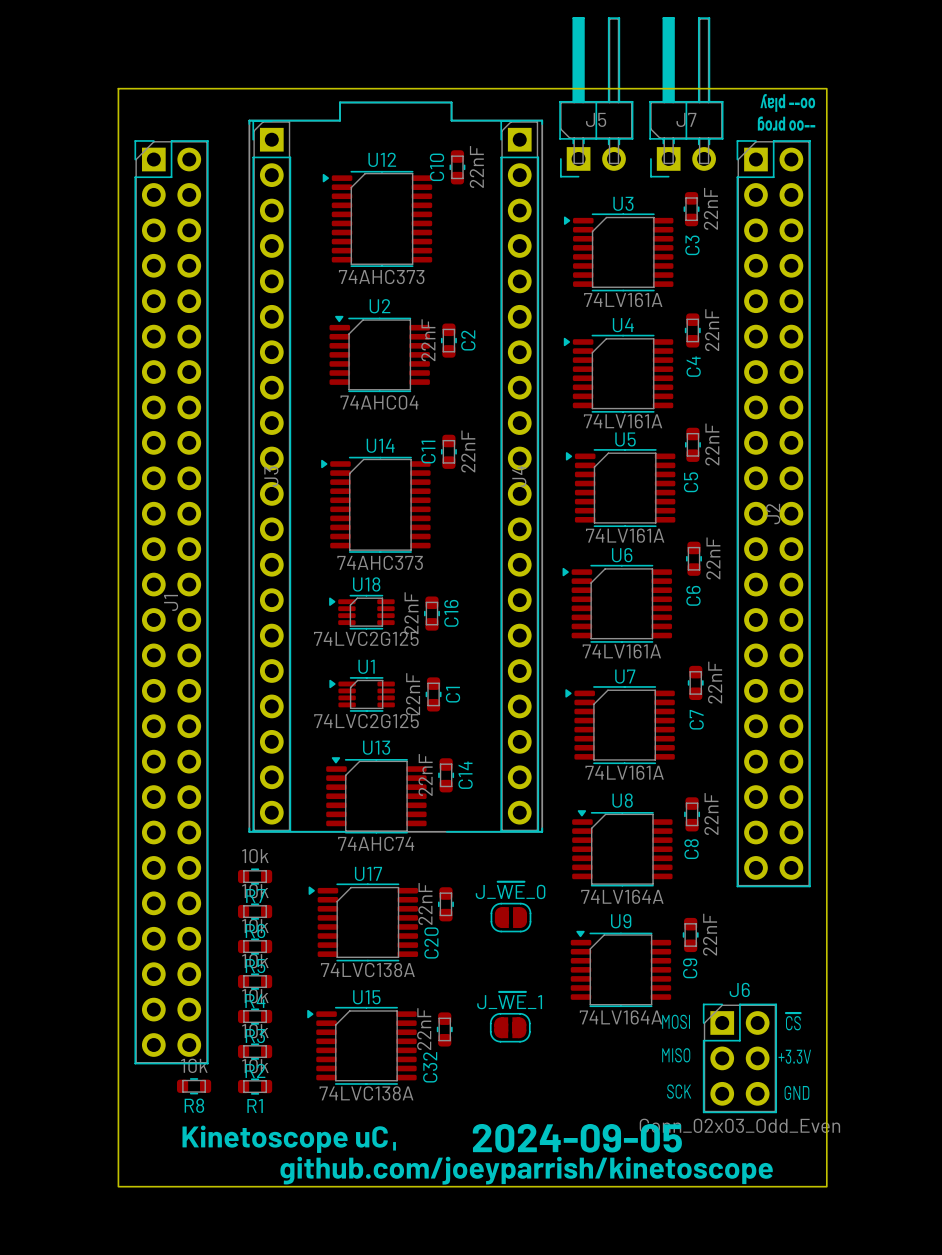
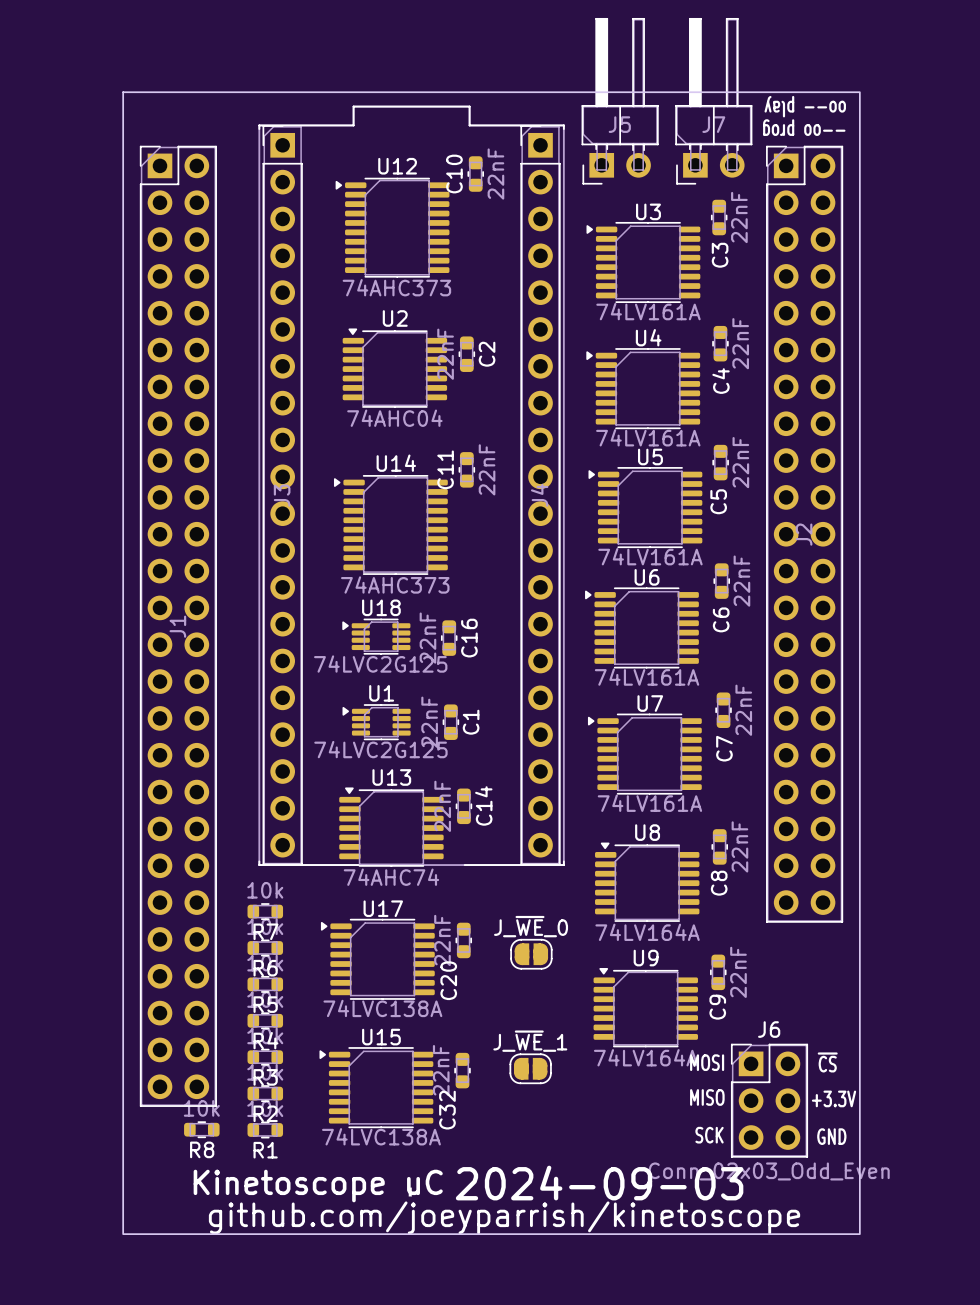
text: 2024-09-05 (577, 1138) -> 2024-09-03 (599, 1183)

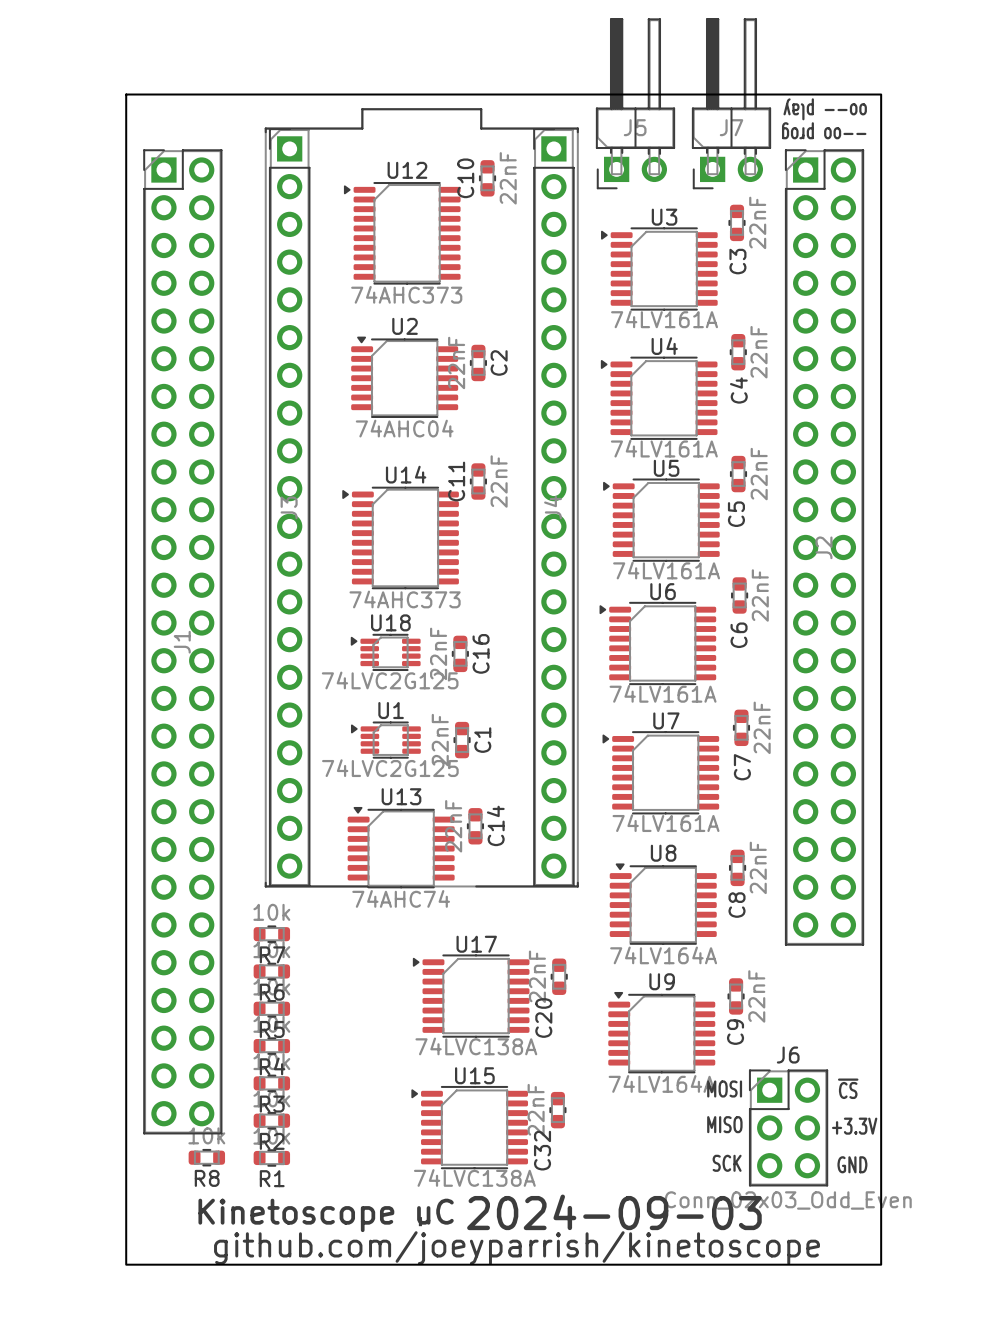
C20 position: (463, 940) -> (559, 976)
J_~{WE}_0: (531, 954) -> none
U17 position: (377, 959) -> (471, 996)
J_~{WE}_1: (530, 1068) -> none
C32 position: (462, 1070) -> (557, 1110)
U15 position: (376, 1087) -> (469, 1127)

